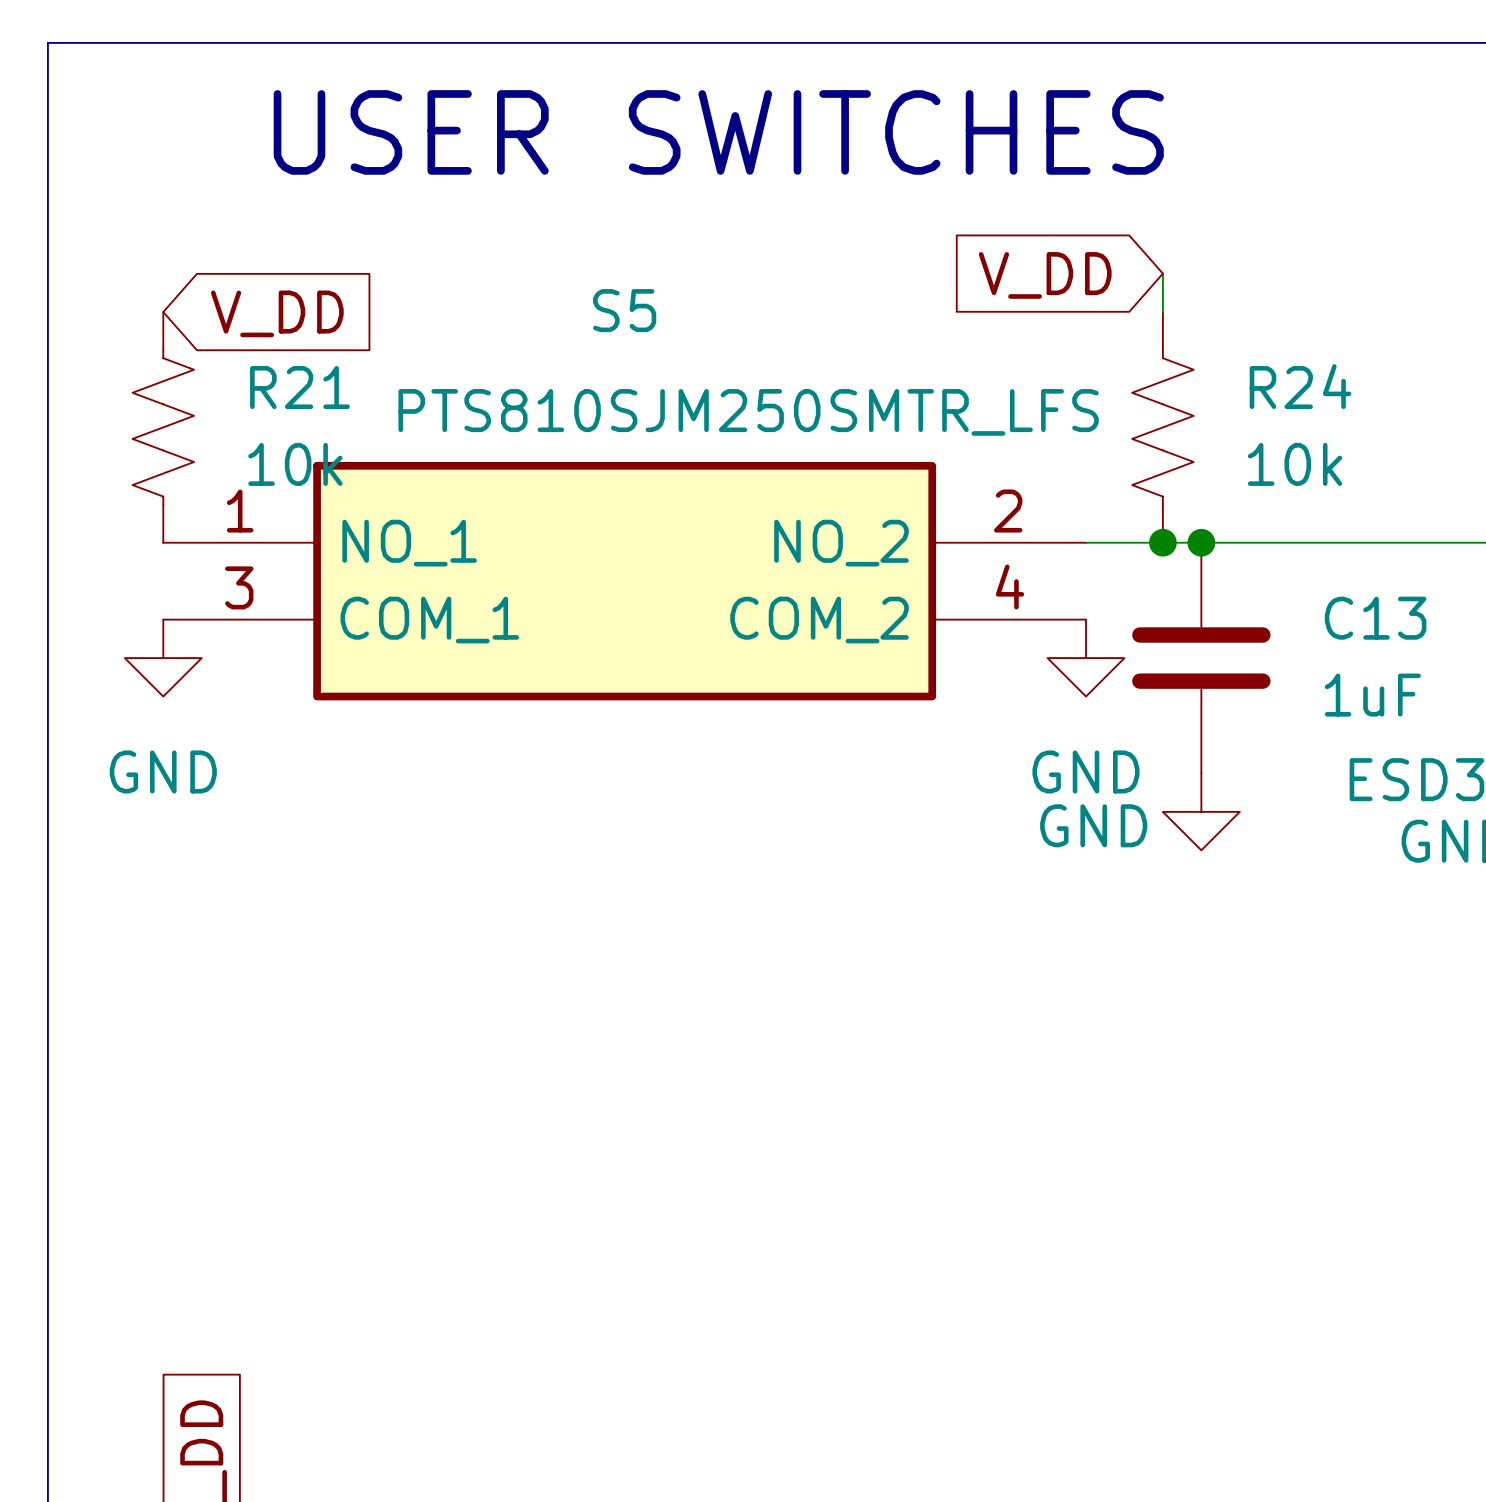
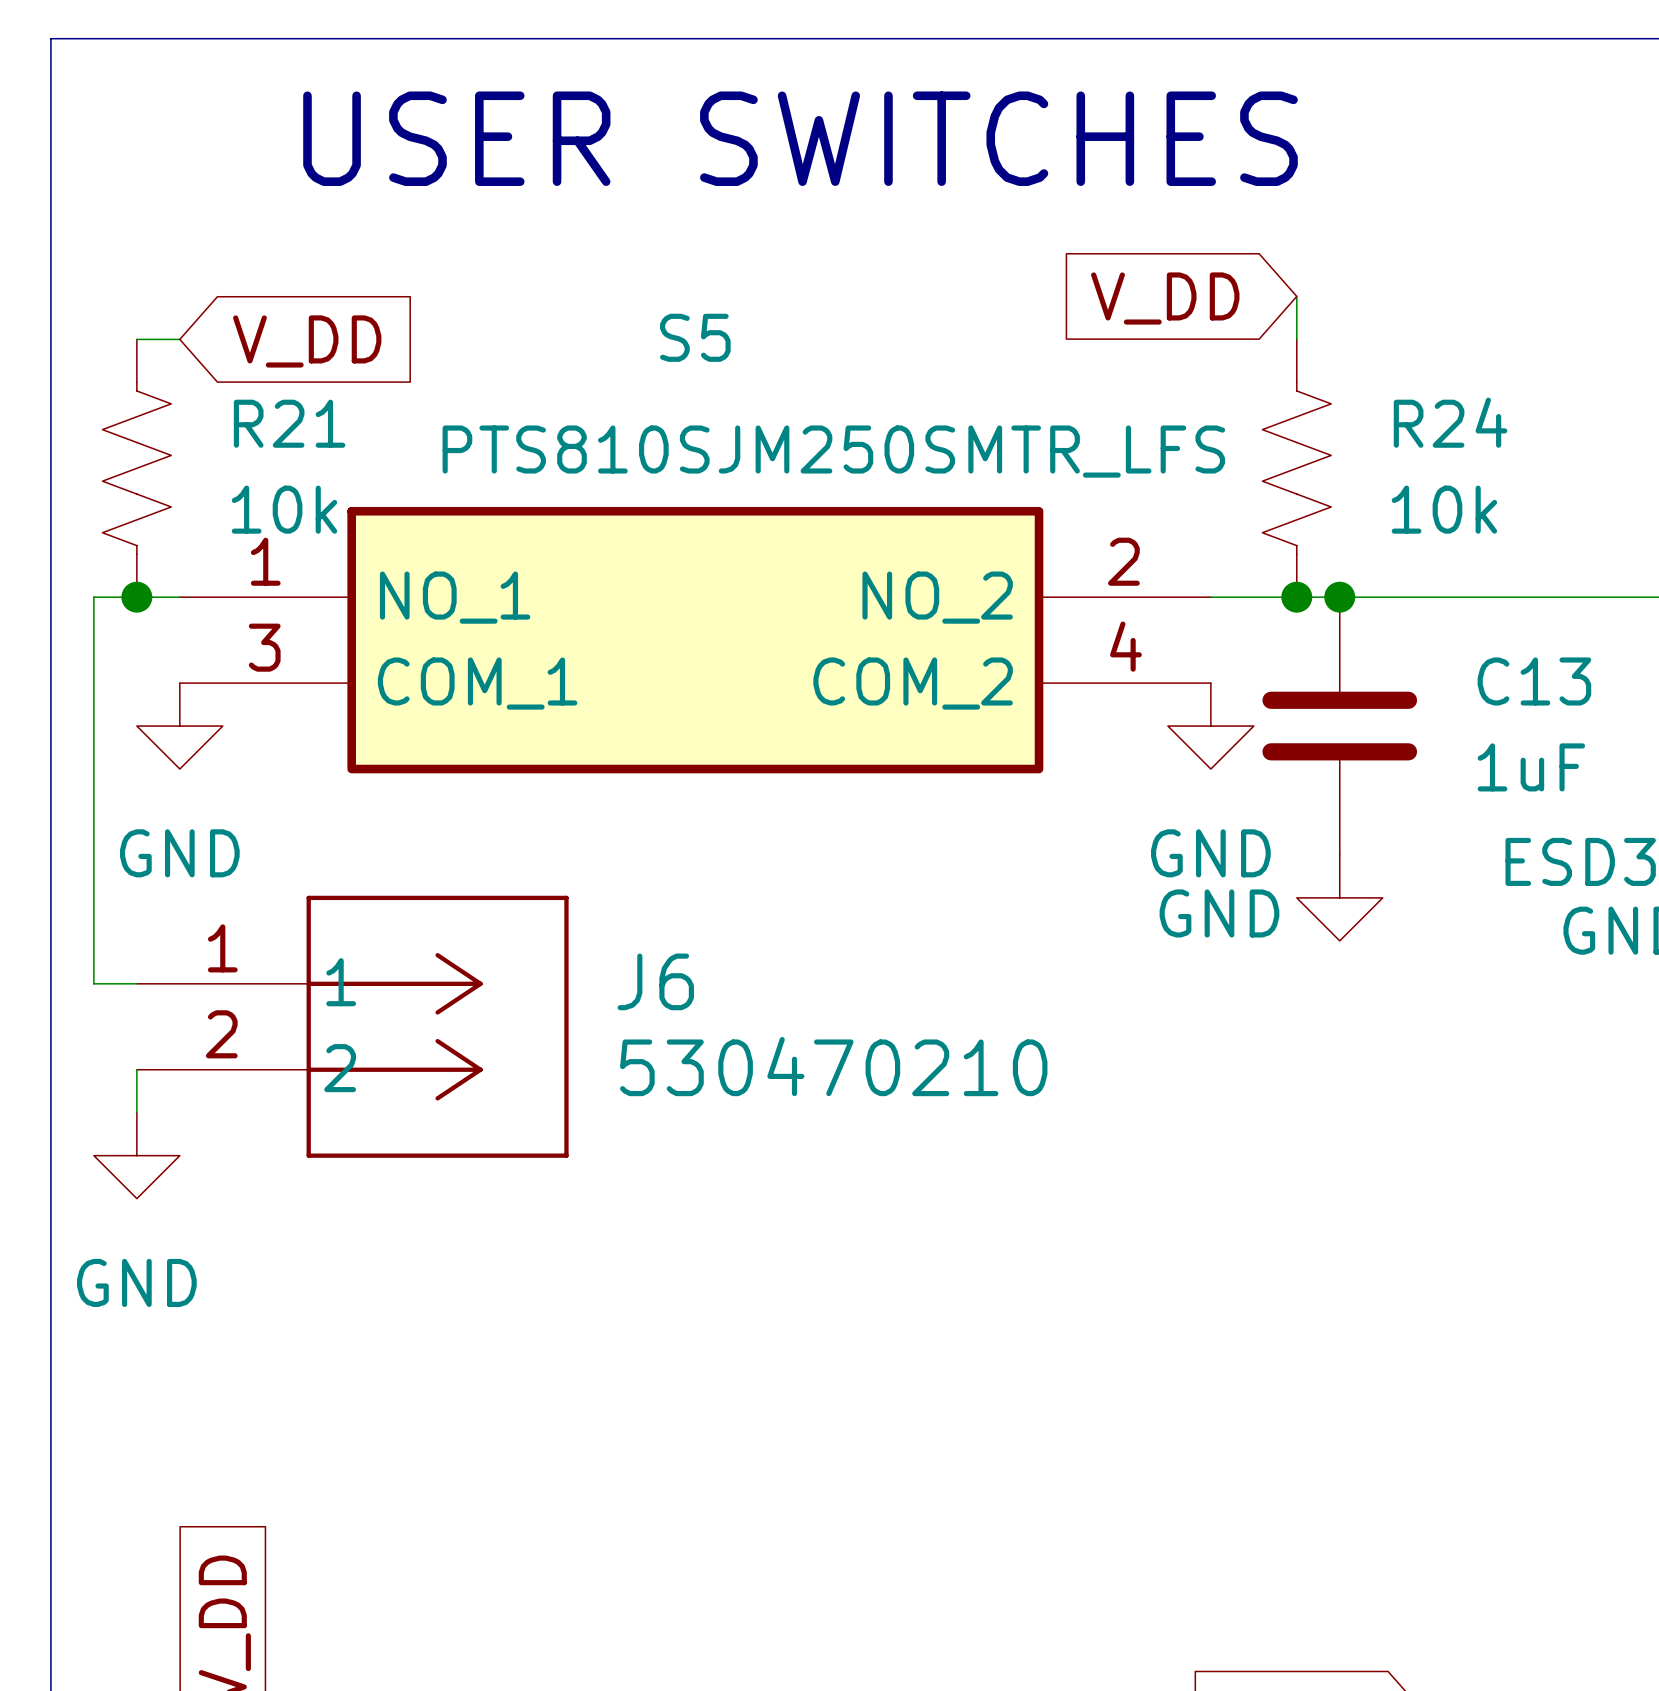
wire: none -> (136, 339) (179, 339)
R21 position: (163, 427) -> (136, 468)
junction: none -> (136, 597)
wire: none -> (179, 597) (93, 597) (93, 983) (136, 983)
J6: none -> 530470210 (352, 1026)
wire: none -> (136, 1069) (136, 1112)
power symbol: none -> GND (136, 1155)

